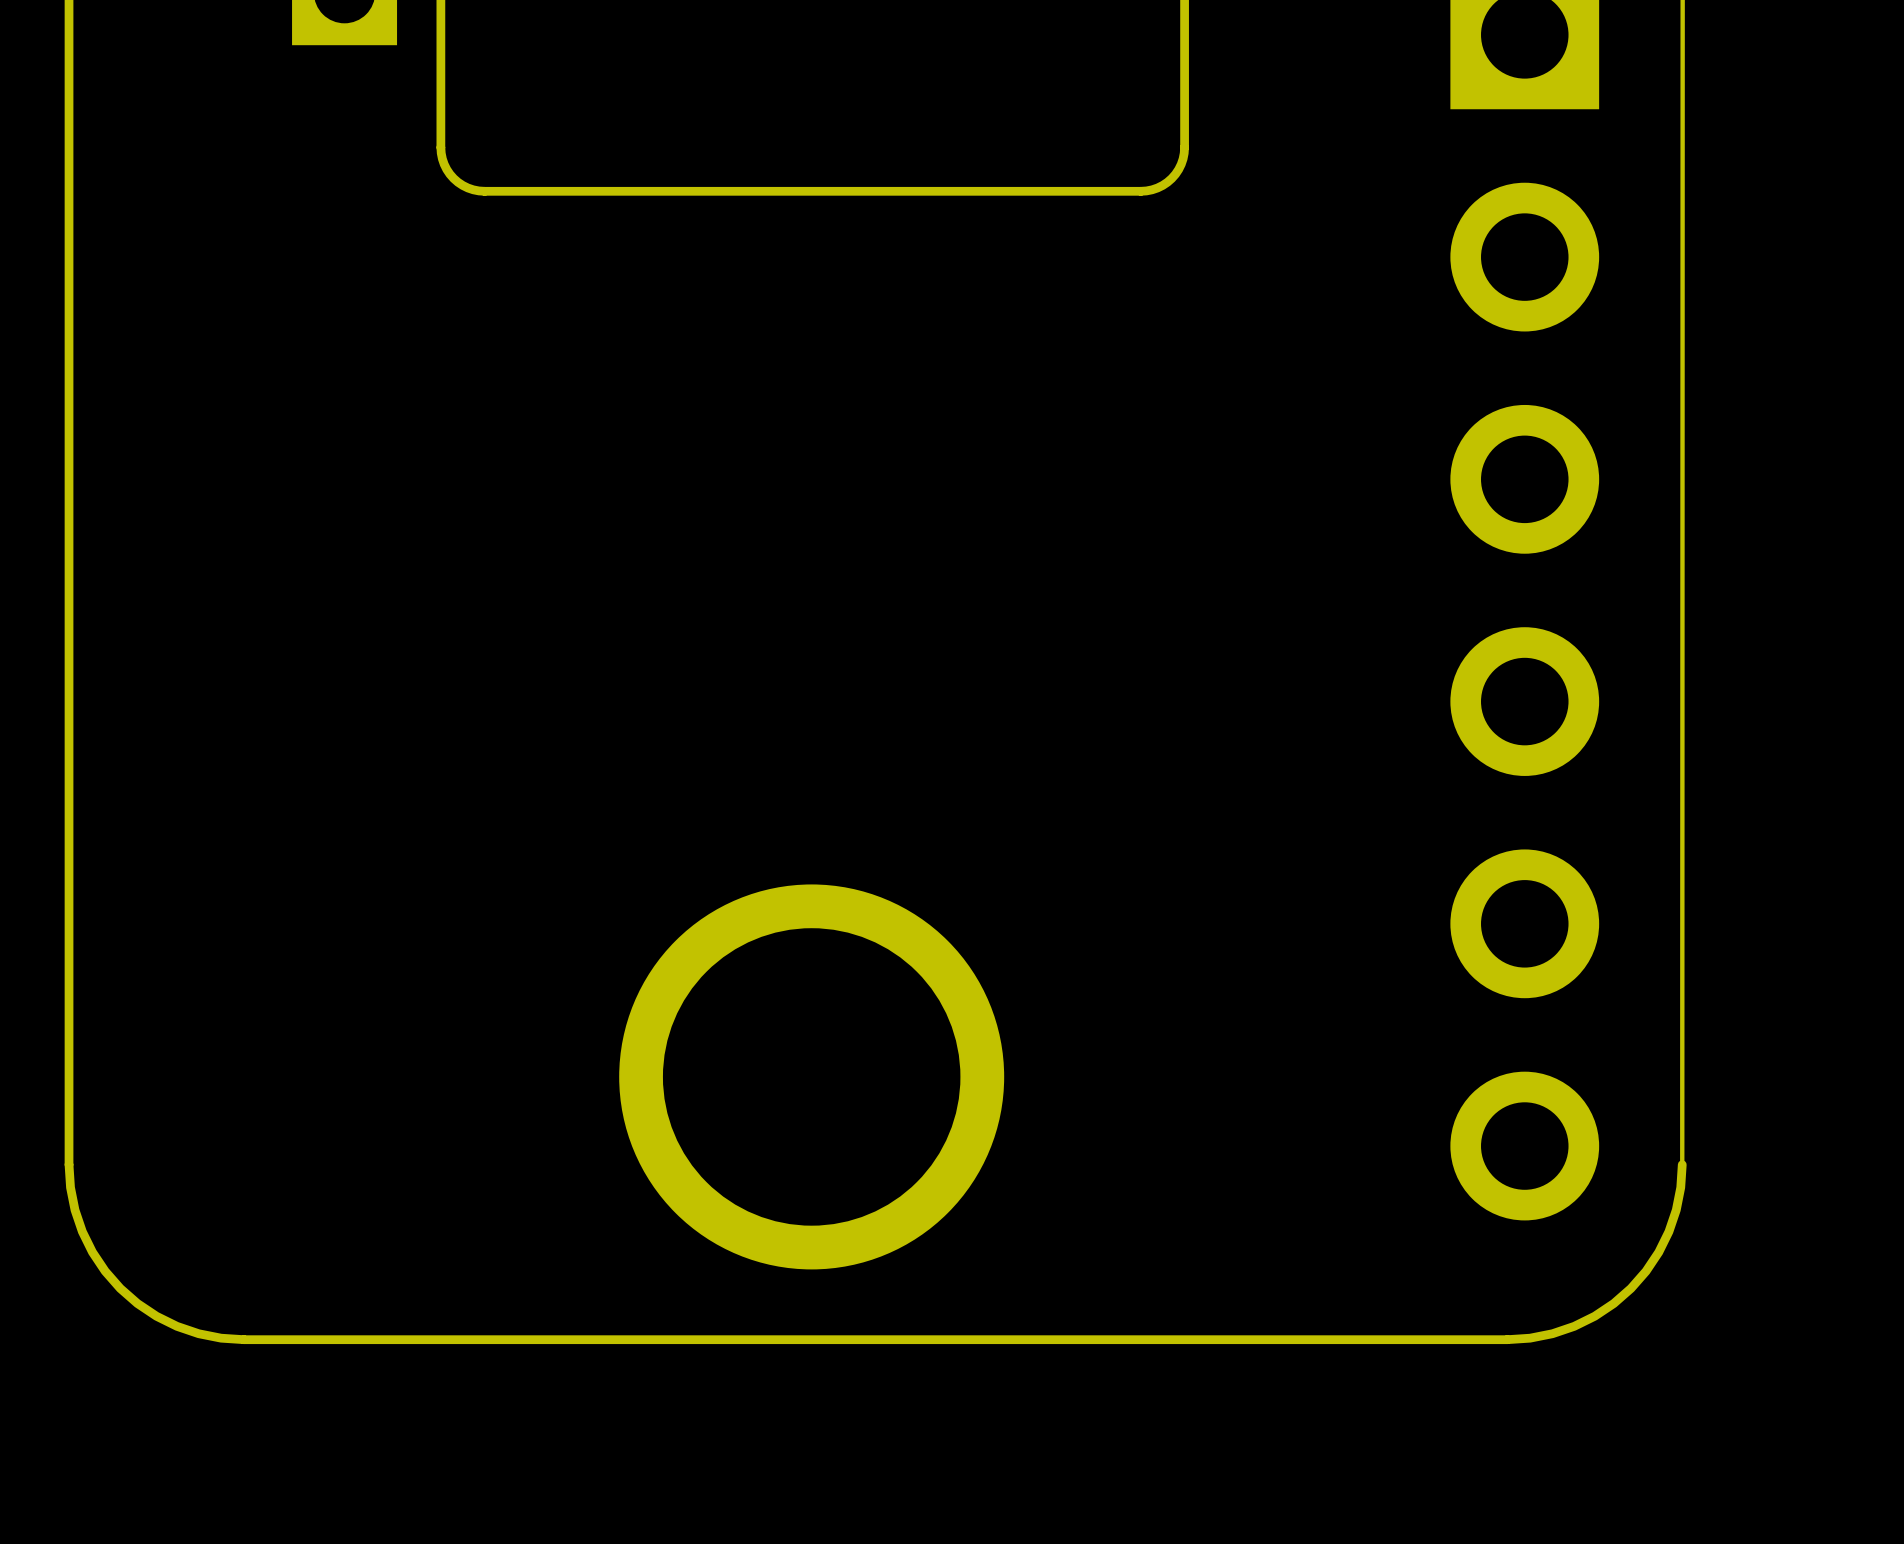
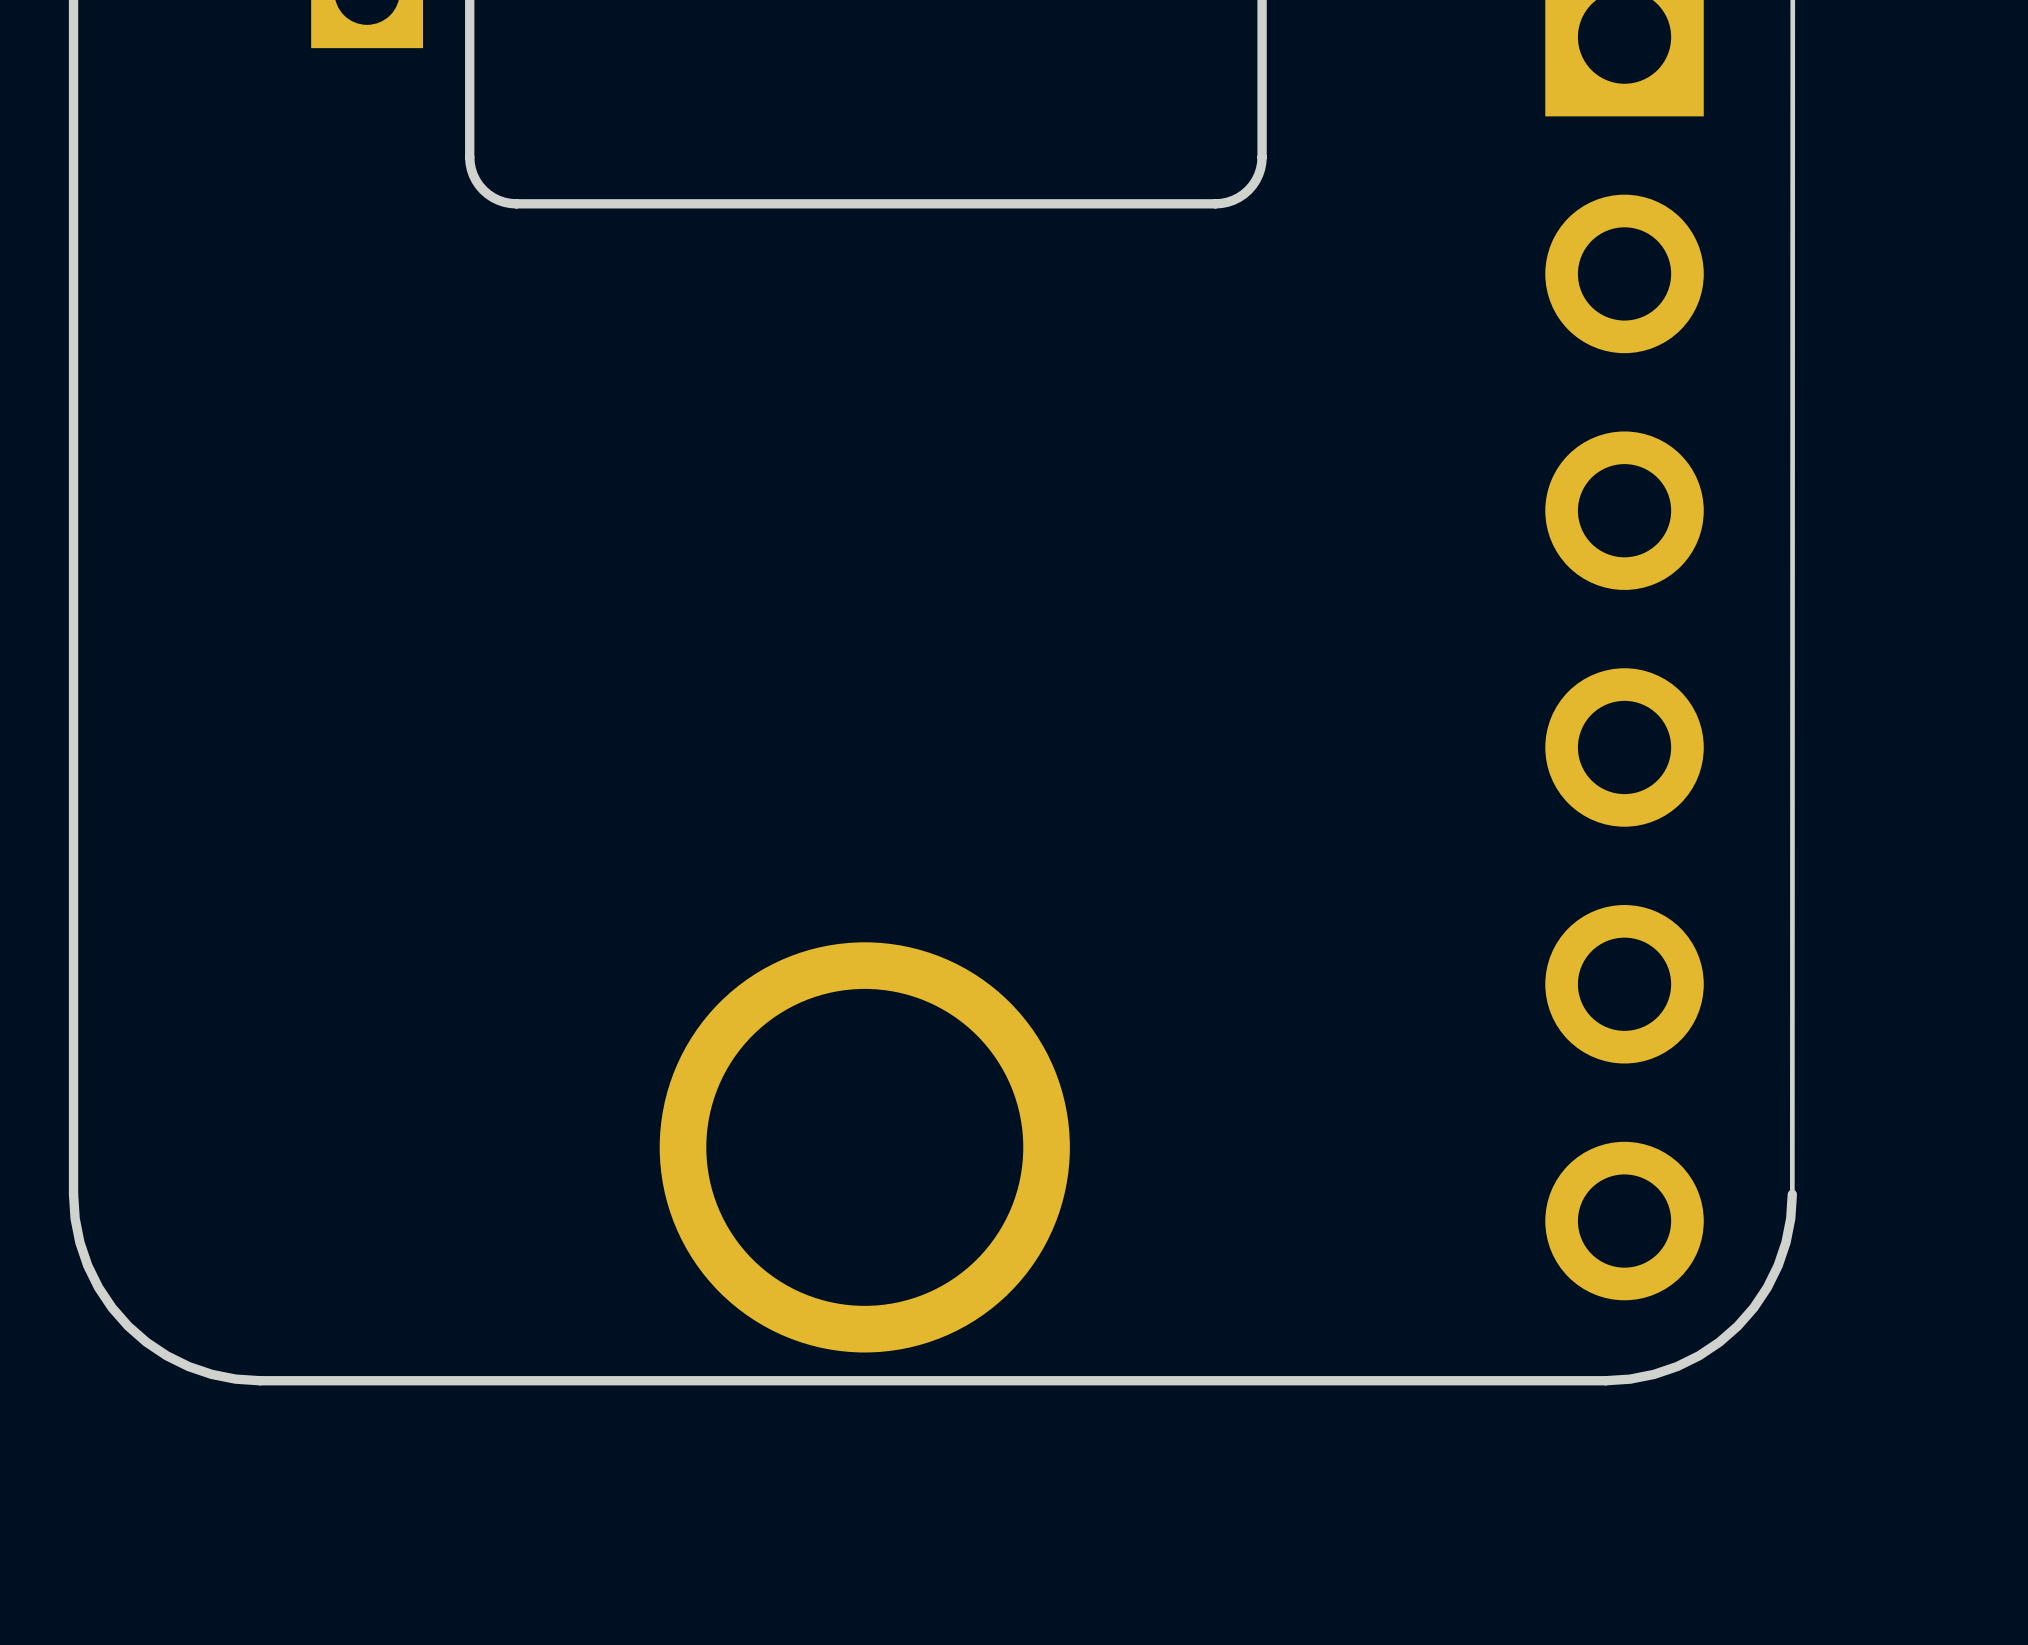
board edge: (69, 1120) (70, 1187) (74, 1209) (92, 1252) (105, 1271) (137, 1303) (177, 1326) (221, 1338) (244, 1339) (1530, 1338) (1552, 1333) (1594, 1316) (1613, 1303) (1646, 1271) (1658, 1252) (1676, 1209) (1680, 1187) (1682, 1120) -> (73, 1194) (75, 1218) (79, 1242) (87, 1265) (98, 1287) (112, 1307) (128, 1326) (146, 1342) (166, 1355) (188, 1366) (211, 1374) (235, 1379) (259, 1380) (1605, 1380) (1630, 1379) (1654, 1374) (1677, 1366) (1699, 1355) (1719, 1342) (1737, 1326) (1753, 1307) (1767, 1287) (1778, 1265) (1785, 1242) (1790, 1218) (1792, 1194)

